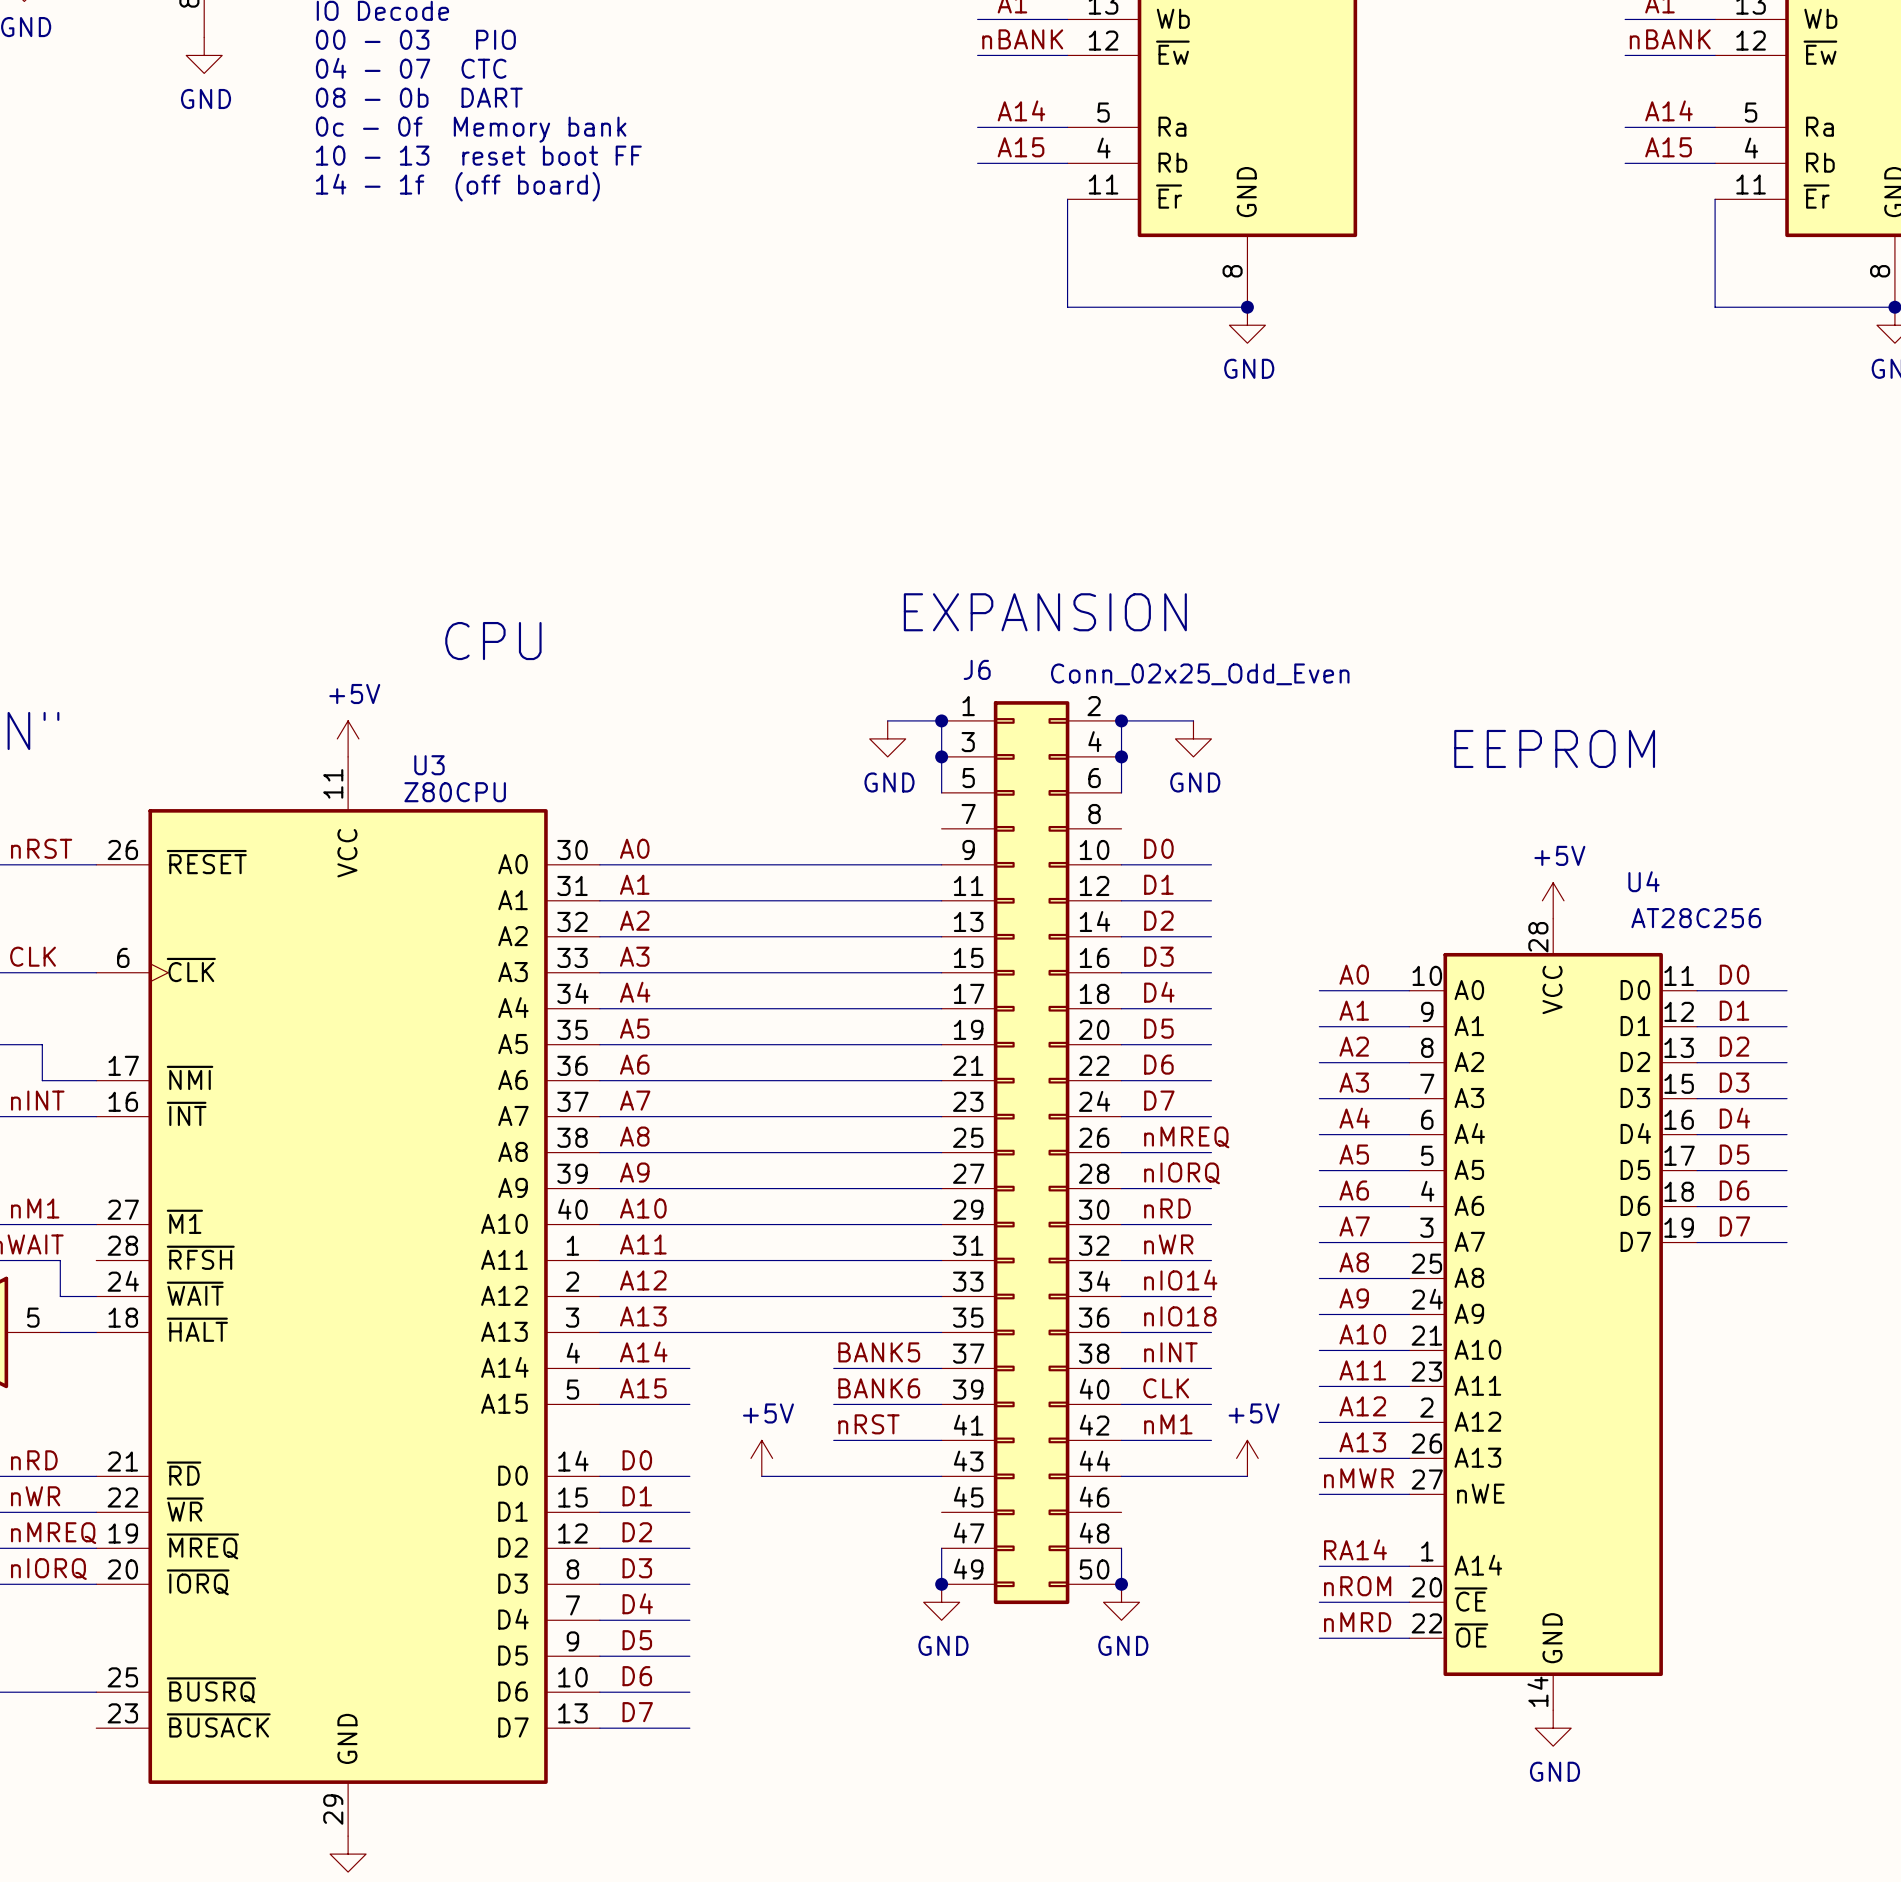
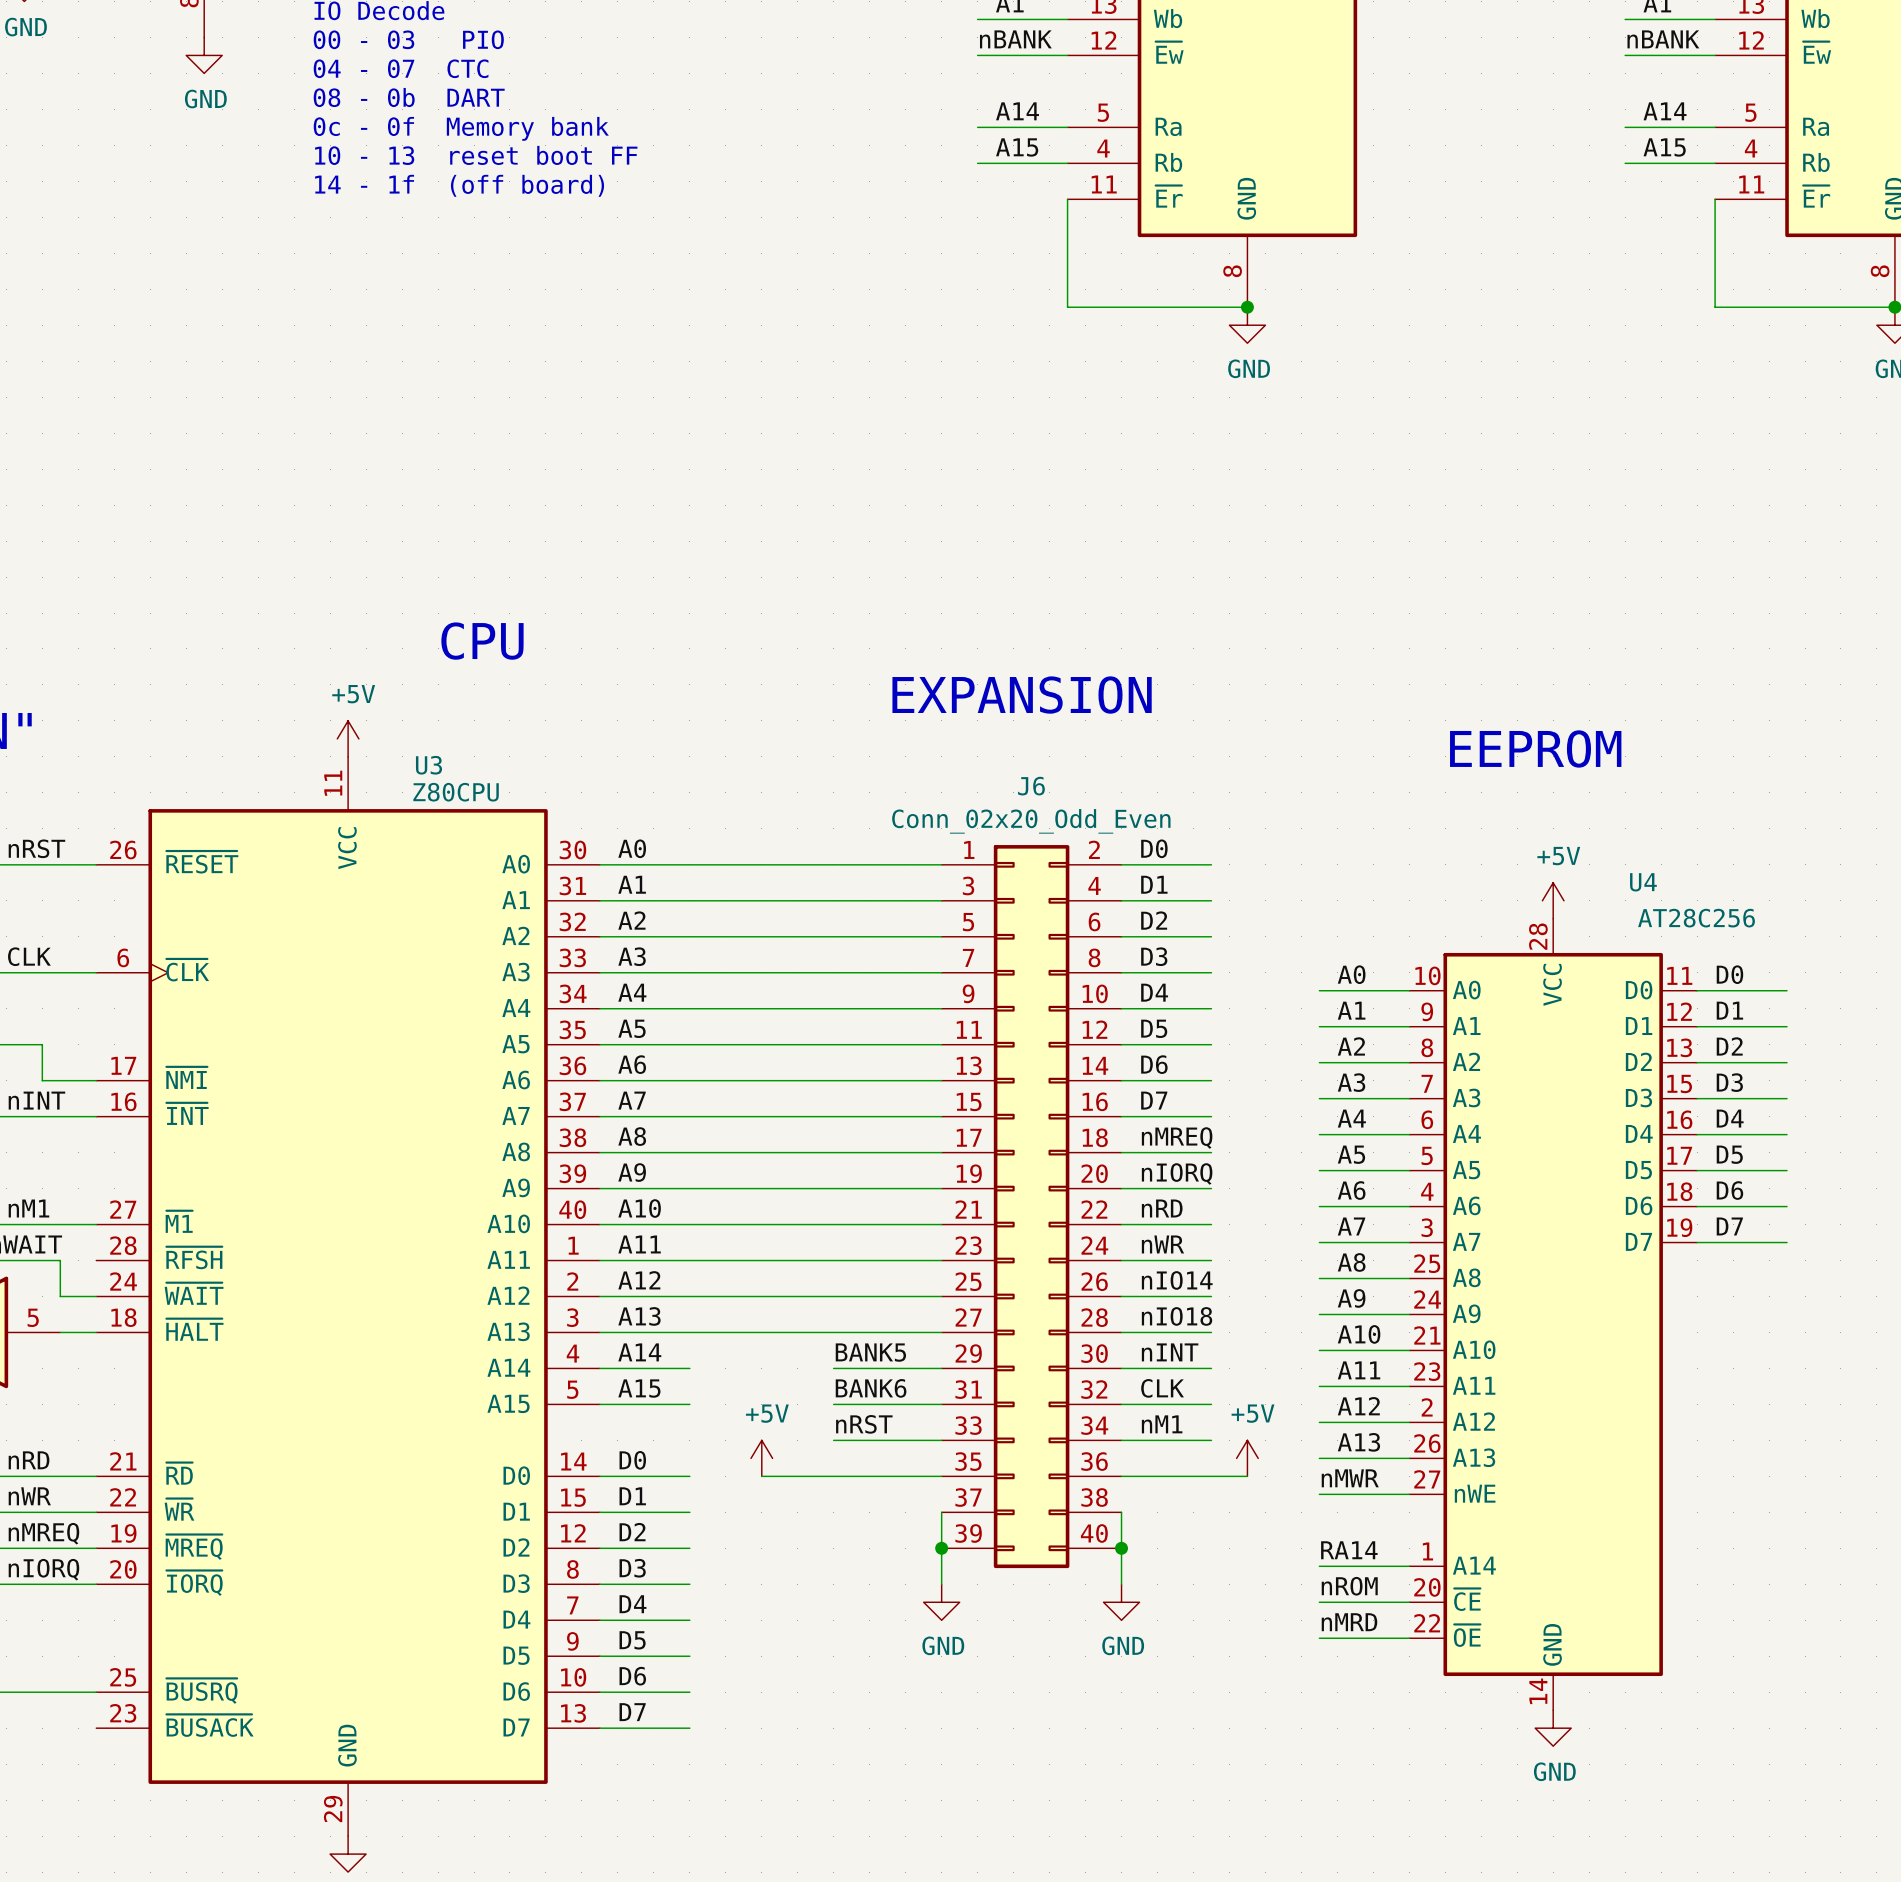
text position: EXPANSION (1045, 612) -> EXPANSION (1022, 695)
J6 name position: J6 (977, 669) -> J6 (1031, 786)
J6 value: Conn_02x25_Odd_Even (1200, 674) -> Conn_02x20_Odd_Even (1031, 821)
J6 symbol: [941, 701, 1122, 1605] -> [941, 845, 1122, 1569]
wire: (887, 720) (941, 720) (941, 792) -> none
junction: (941, 720) -> none
junction: (1121, 720) -> none
wire: (1193, 720) (1121, 720) (1121, 792) -> none
power symbol: GND (887, 738) -> none
power symbol: GND (1193, 738) -> none
junction: (941, 756) -> none
junction: (1121, 756) -> none
wire: none -> (941, 1512) (941, 1548)
wire: none -> (1121, 1512) (1121, 1548)
junction position: (941, 1584) -> (941, 1548)
junction position: (1121, 1584) -> (1121, 1548)

